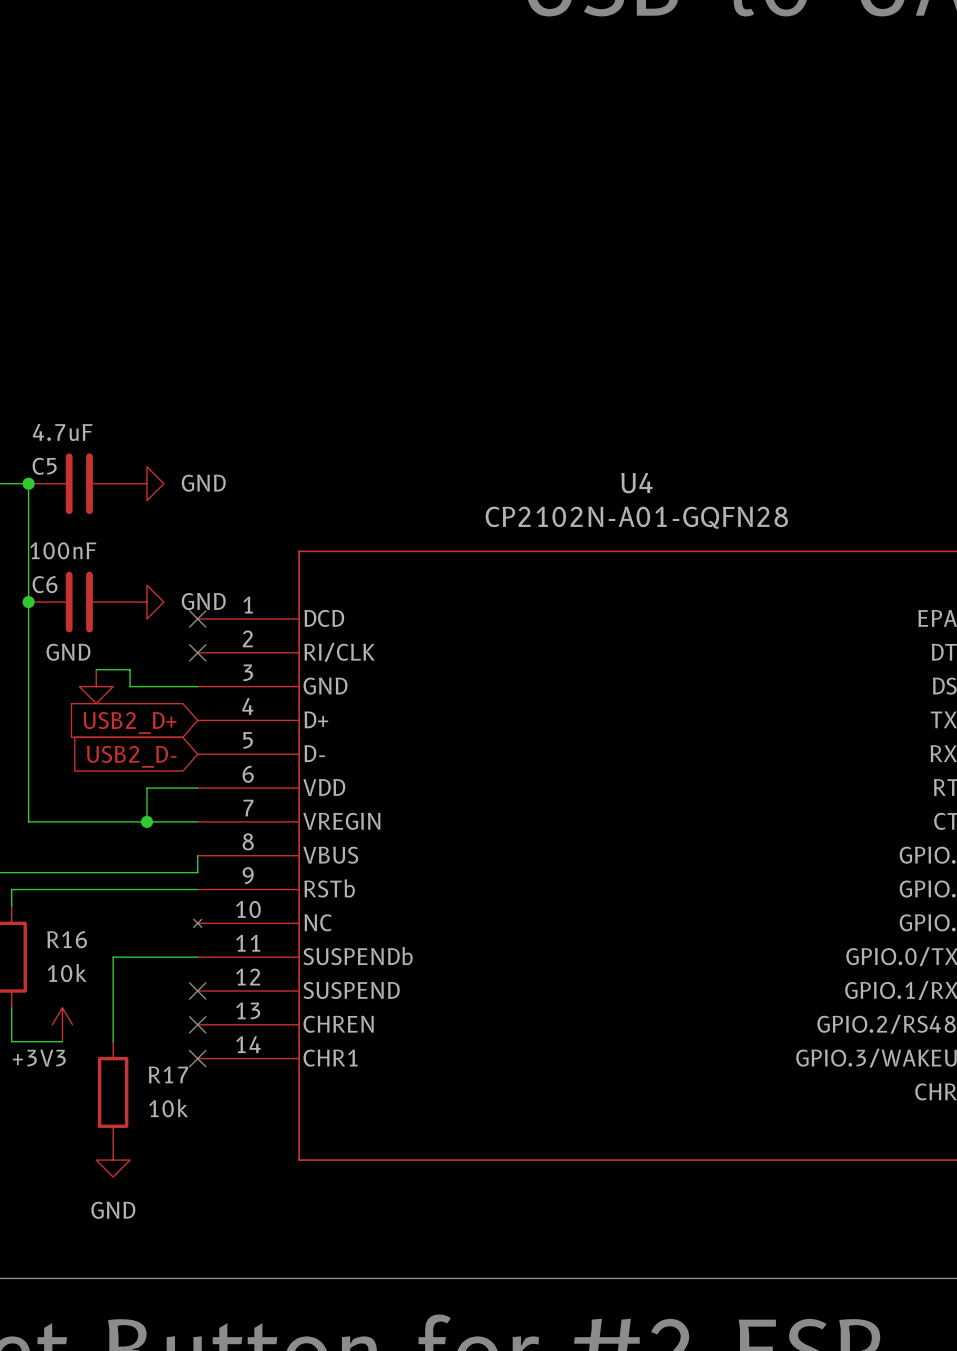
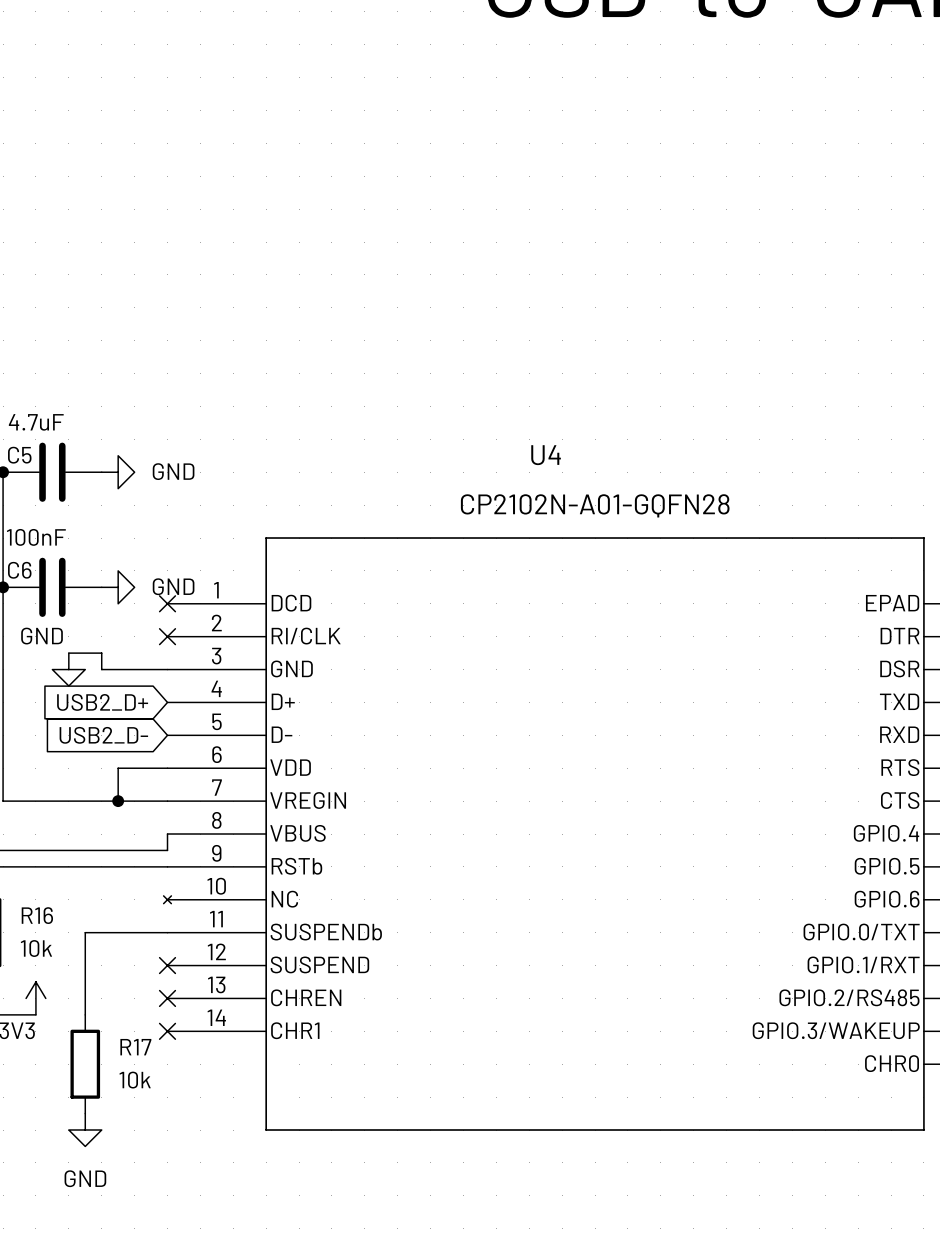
U4 name position: U4 (637, 483) -> U4 (546, 455)

